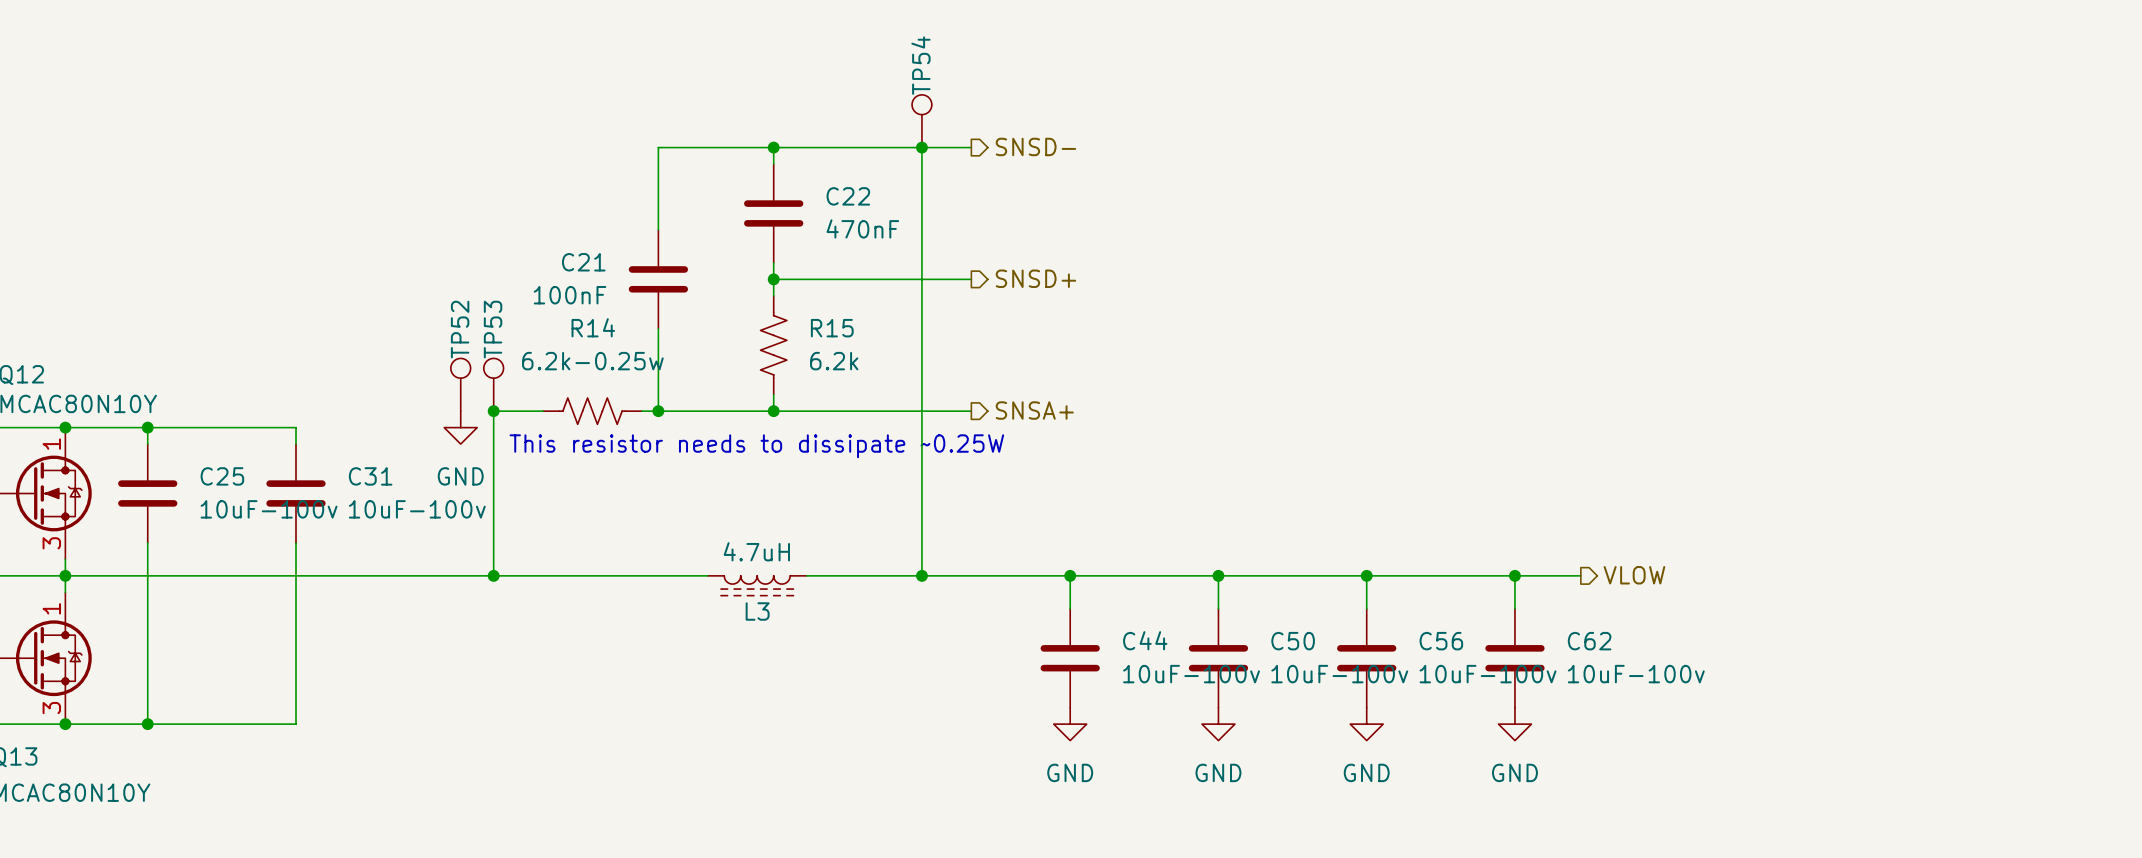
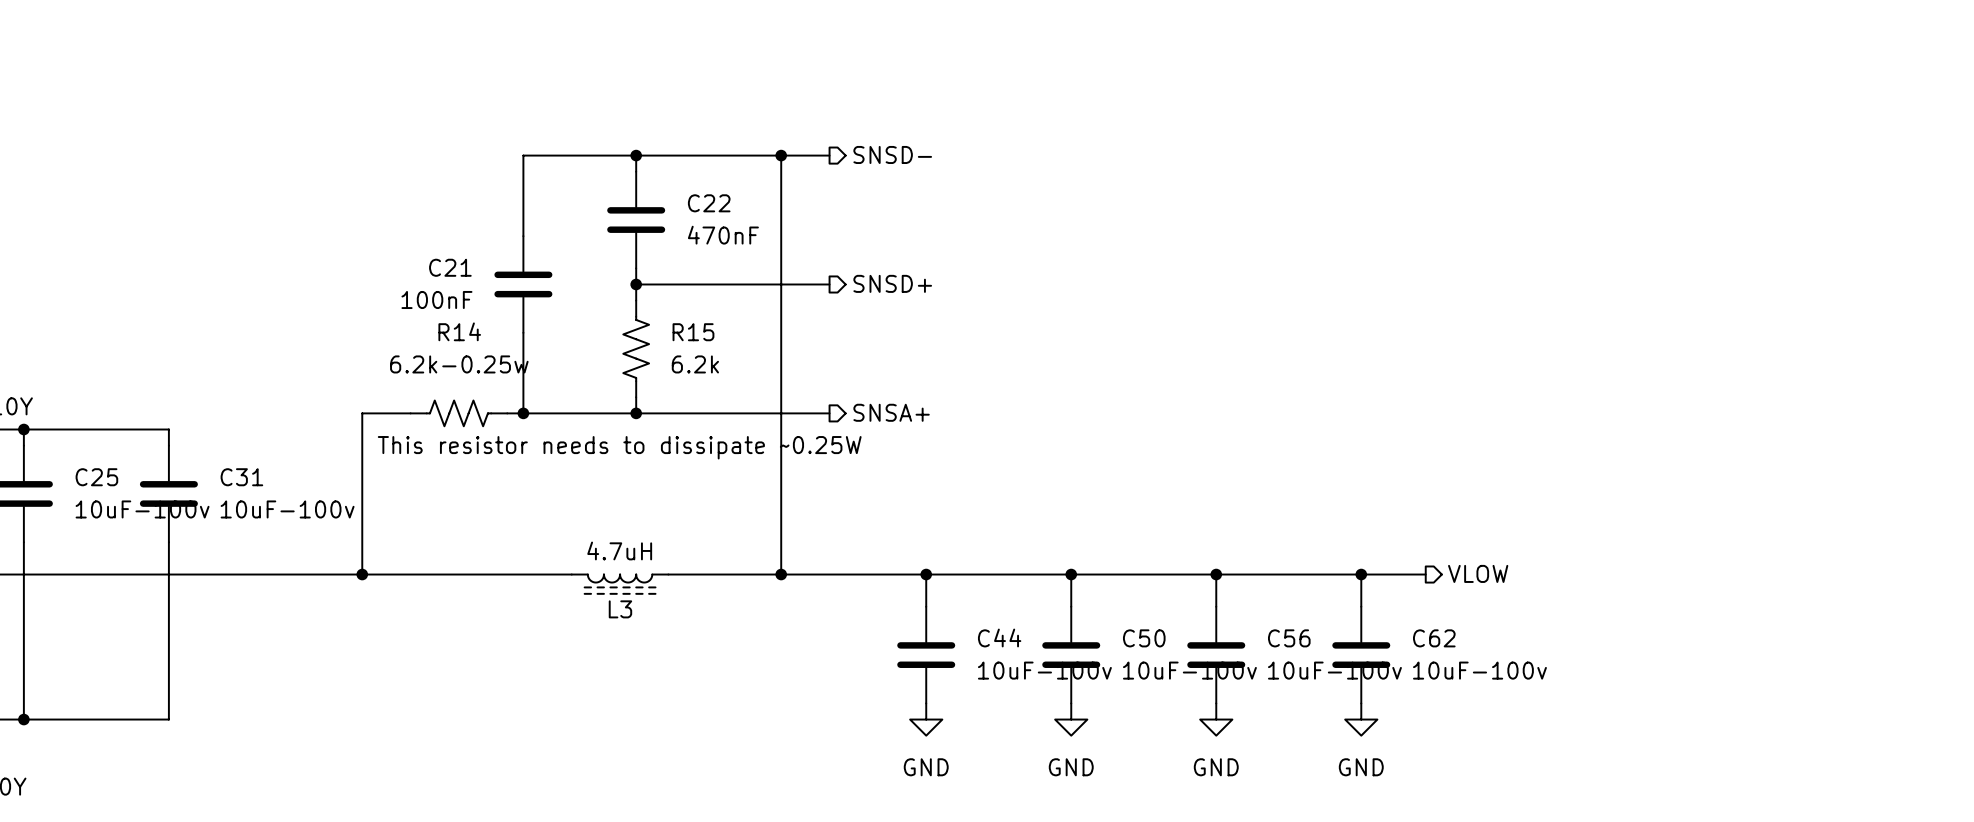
TP54: (921, 121) -> none
TP52: (460, 384) -> none
TP53: (493, 384) -> none
junction: (493, 411) -> none
power symbol: GND (460, 427) -> none

